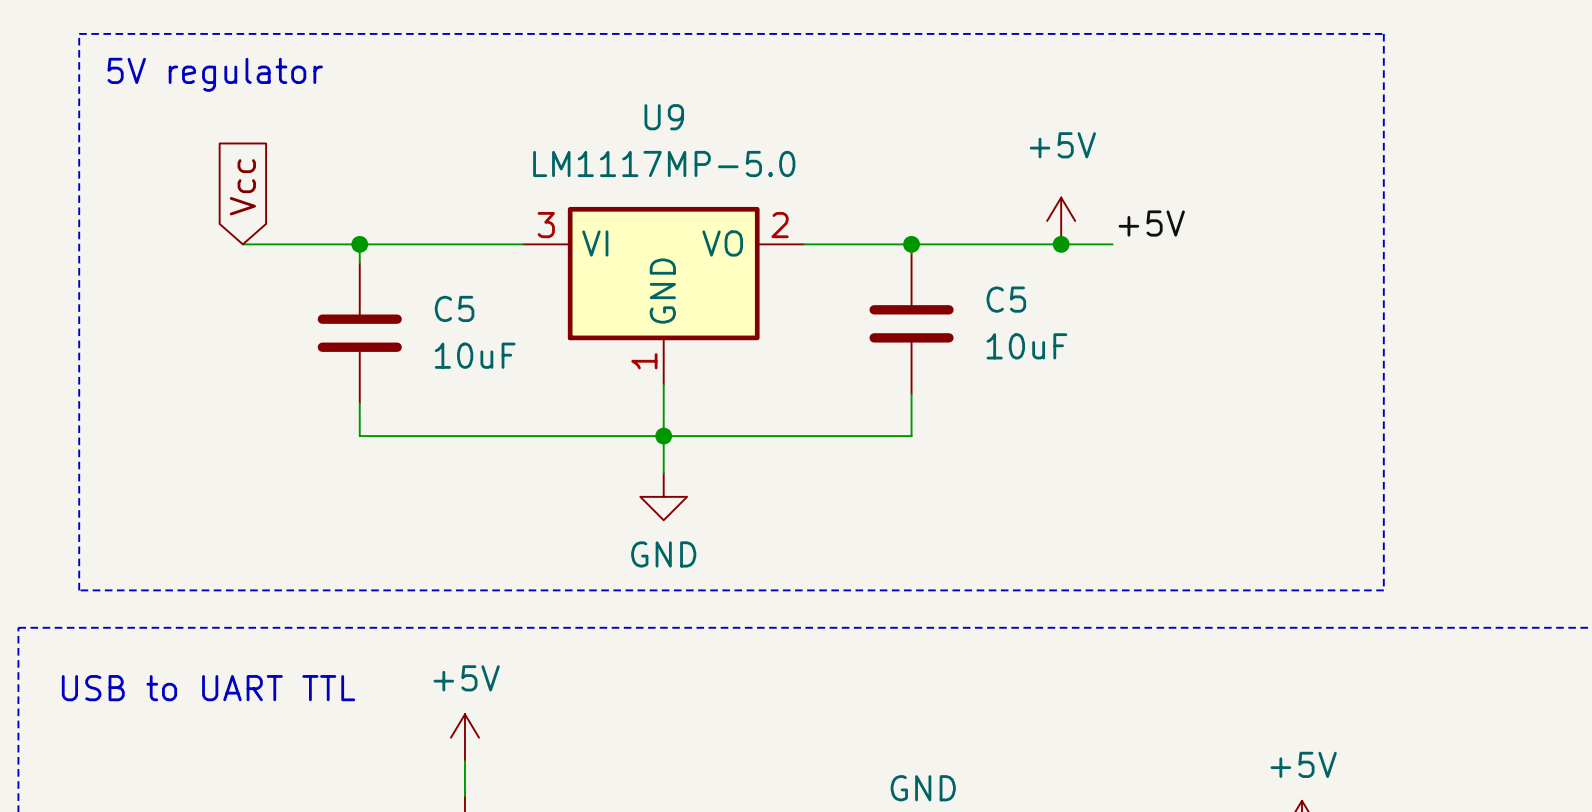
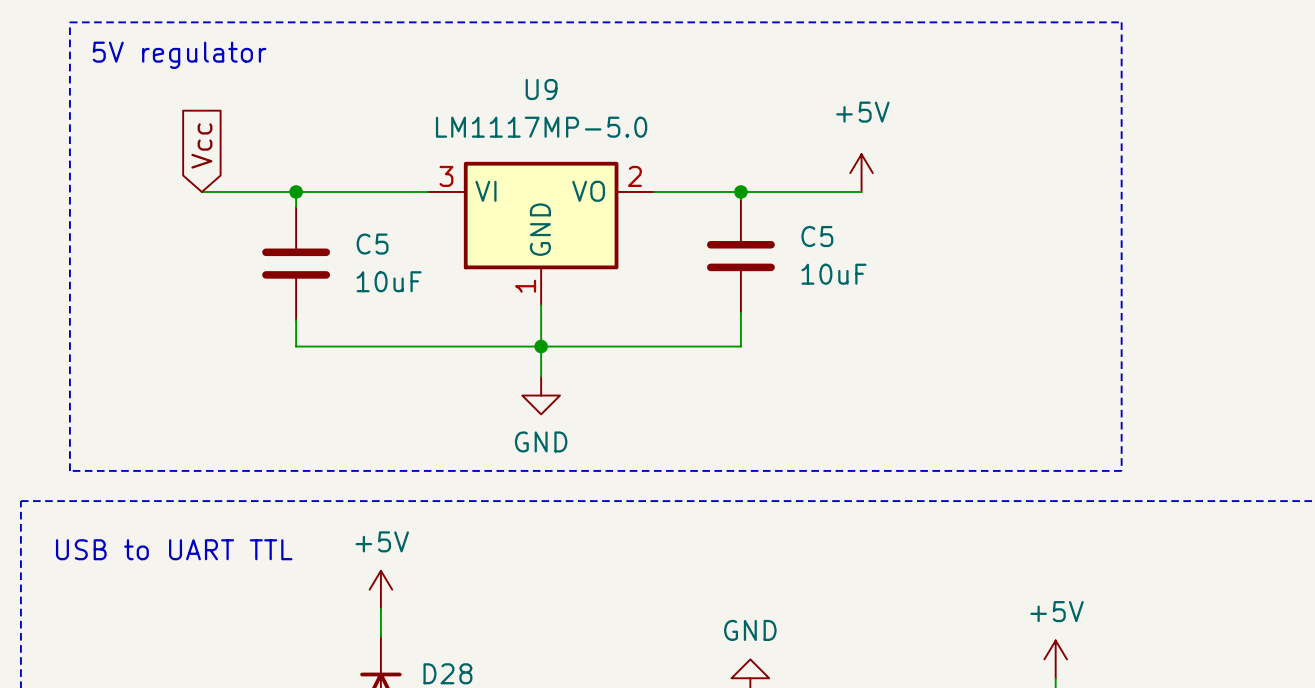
label: +5V (1151, 223) -> none
wire: (1061, 244) (1112, 244) -> none
junction: (1061, 244) -> none

